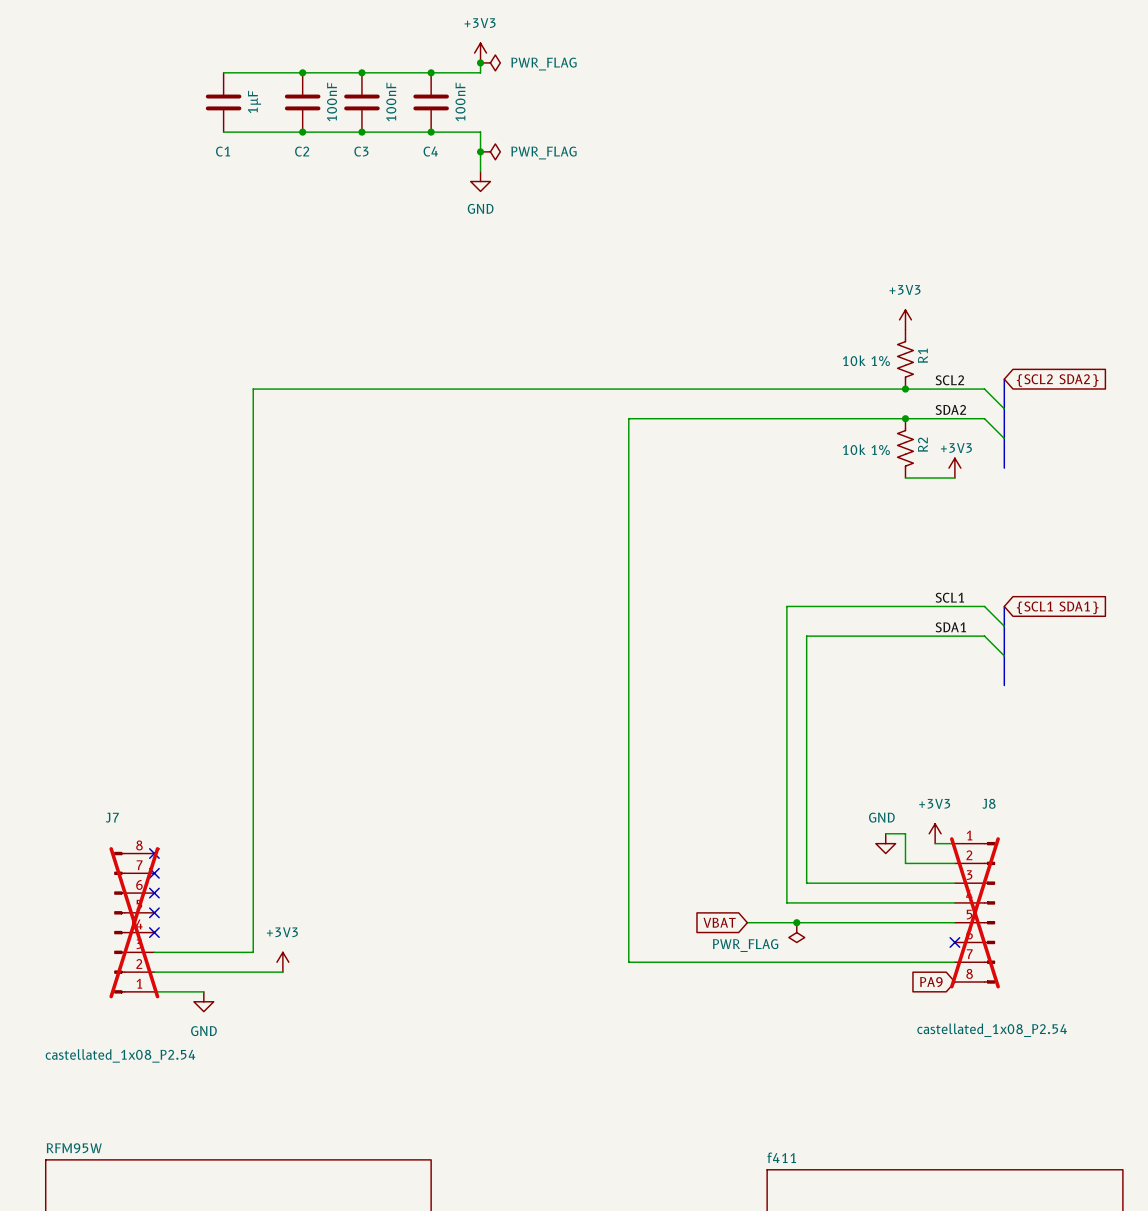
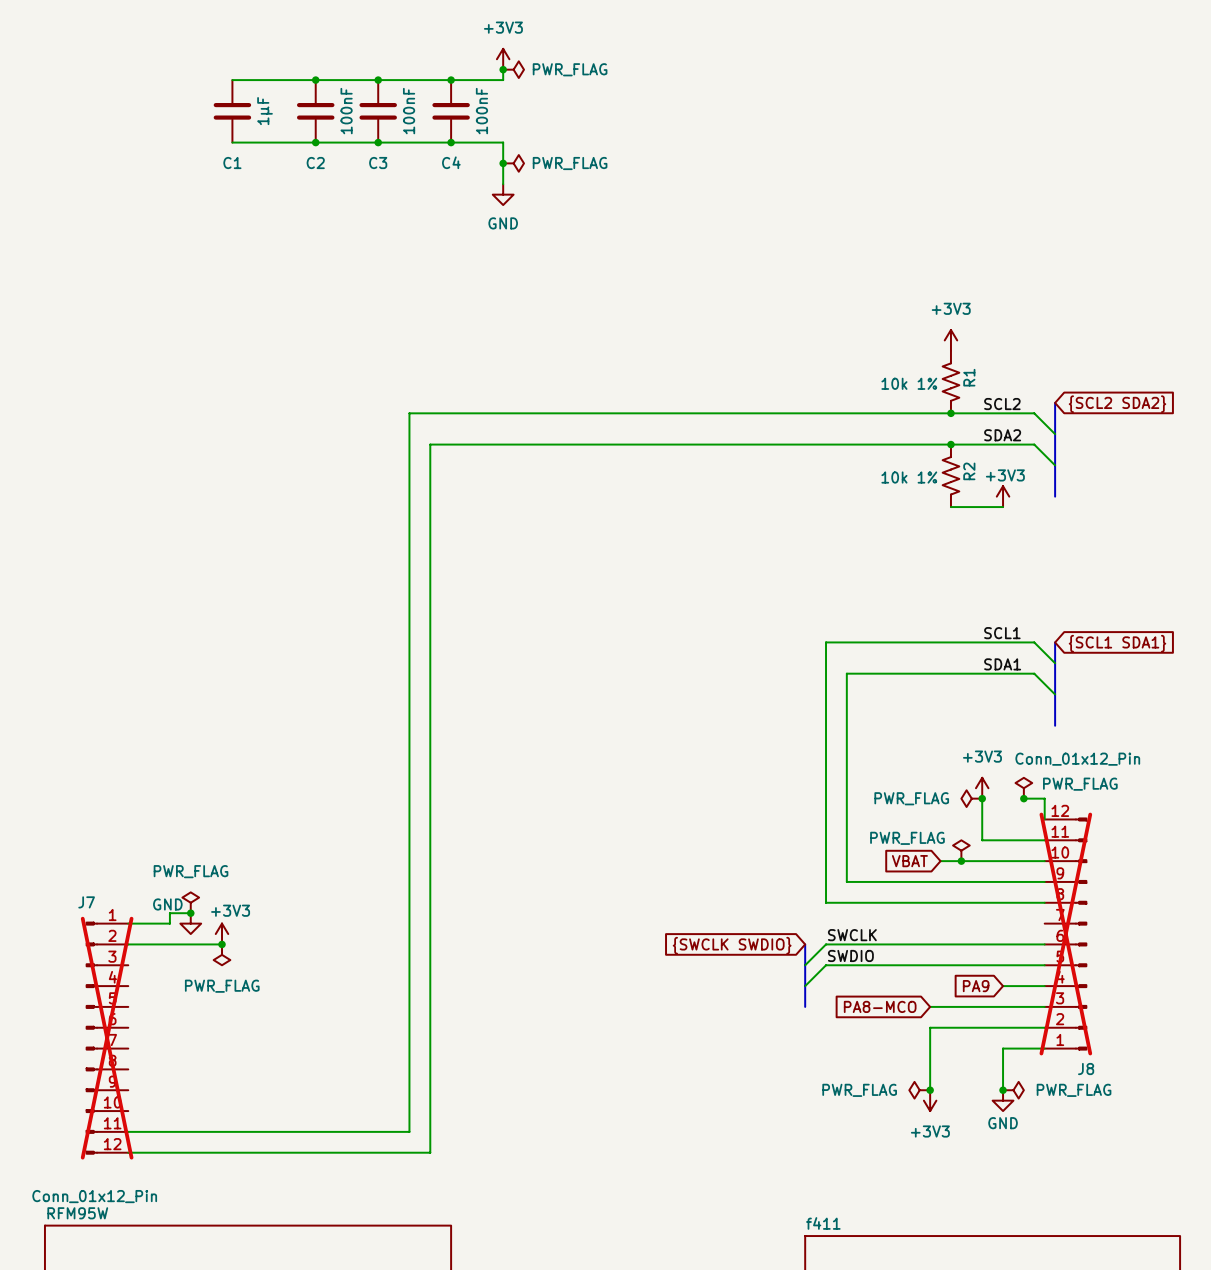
wire: (391, 389) (253, 389) (253, 952) (154, 952) -> (409, 413) (409, 1131) (128, 1131)
wire: (628, 418) (628, 962) (954, 962) -> (659, 444) (430, 444) (430, 1152) (128, 1152)
power symbol: none -> PWR_FLAG (1023, 788)
power symbol: none -> PWR_FLAG (971, 798)
wire: none -> (982, 798) (982, 840) (1044, 840)
junction: none -> (982, 798)
wire: none -> (1023, 798) (1044, 798) (1044, 819)
junction: none -> (1023, 798)
J8 name position: J8 (988, 803) -> J8 (1086, 1069)
power symbol: none -> PWR_FLAG (961, 850)
wire: none -> (940, 861) (1044, 861)
junction: none -> (961, 861)
J7 name position: J7 (112, 817) -> J7 (86, 902)
wire: (806, 833) (806, 883) (954, 883) -> (846, 881) (930, 881)
wire: (905, 833) (905, 863) (954, 863) -> (950, 881) (1044, 881)
power symbol position: +3V3 (935, 833) -> +3V3 (982, 788)
J8 symbol: [954, 842, 996, 984] -> [1044, 817, 1087, 1051]
power symbol: GND (885, 843) -> none
wire: (935, 843) (954, 843) -> none
J7 symbol: [114, 851, 155, 994] -> [85, 921, 129, 1155]
no-connect mark: (154, 853) -> none
power symbol: none -> PWR_FLAG (190, 902)
wire: (786, 853) (786, 902) (954, 902) -> (826, 902) (1044, 902)
wire: none -> (190, 913) (169, 913) (169, 923) (128, 923)
junction: none -> (190, 913)
no-connect mark: (154, 873) -> none
label: none -> SWCLK (852, 935)
wire: none -> (128, 944) (222, 944)
no-connect mark: (154, 893) -> none
junction: none -> (222, 944)
bus: none -> (805, 944) (805, 1006)
wire: none -> (1044, 944) (826, 944) (805, 965)
global label: none -> {SWCLK SWDIO} (732, 945)
power symbol: none -> PWR_FLAG (222, 954)
label: none -> SWDIO (850, 955)
no-connect mark: (154, 912) -> none
wire: none -> (1044, 965) (826, 965) (805, 986)
global label position: VBAT (719, 922) -> VBAT (909, 861)
wire: (747, 922) (954, 922) -> none
junction: (796, 922) -> none
no-connect mark: (154, 932) -> none
power symbol text position: +3V3 (282, 932) -> +3V3 (230, 910)
power symbol: PWR_FLAG (796, 932) -> none
wire: none -> (1003, 986) (1044, 986)
no-connect mark: (954, 942) -> none
global label: none -> PA8-MCO (880, 1006)
wire: none -> (930, 1006) (1044, 1006)
power symbol position: +3V3 (282, 962) -> +3V3 (222, 934)
wire: (154, 972) (282, 972) -> none
wire: none -> (1044, 1027) (930, 1027) (930, 1090)
global label position: PA9 (931, 982) -> PA9 (976, 986)
wire: (154, 991) (203, 991) -> none
wire: none -> (1044, 1048) (1003, 1048) (1003, 1090)
power symbol position: GND (203, 1001) -> GND (190, 923)
J8 value: castellated_1x08_P2.54 (992, 1030) -> Conn_01x12_Pin (1077, 759)
power symbol text position: GND (203, 1031) -> GND (167, 904)
power symbol: none -> PWR_FLAG (919, 1090)
junction: none -> (930, 1090)
junction: none -> (1003, 1090)
power symbol: none -> PWR_FLAG (1013, 1090)
power symbol: none -> +3V3 (930, 1100)
power symbol: none -> GND (1003, 1100)
J7 value: castellated_1x08_P2.54 (120, 1055) -> Conn_01x12_Pin (94, 1196)

